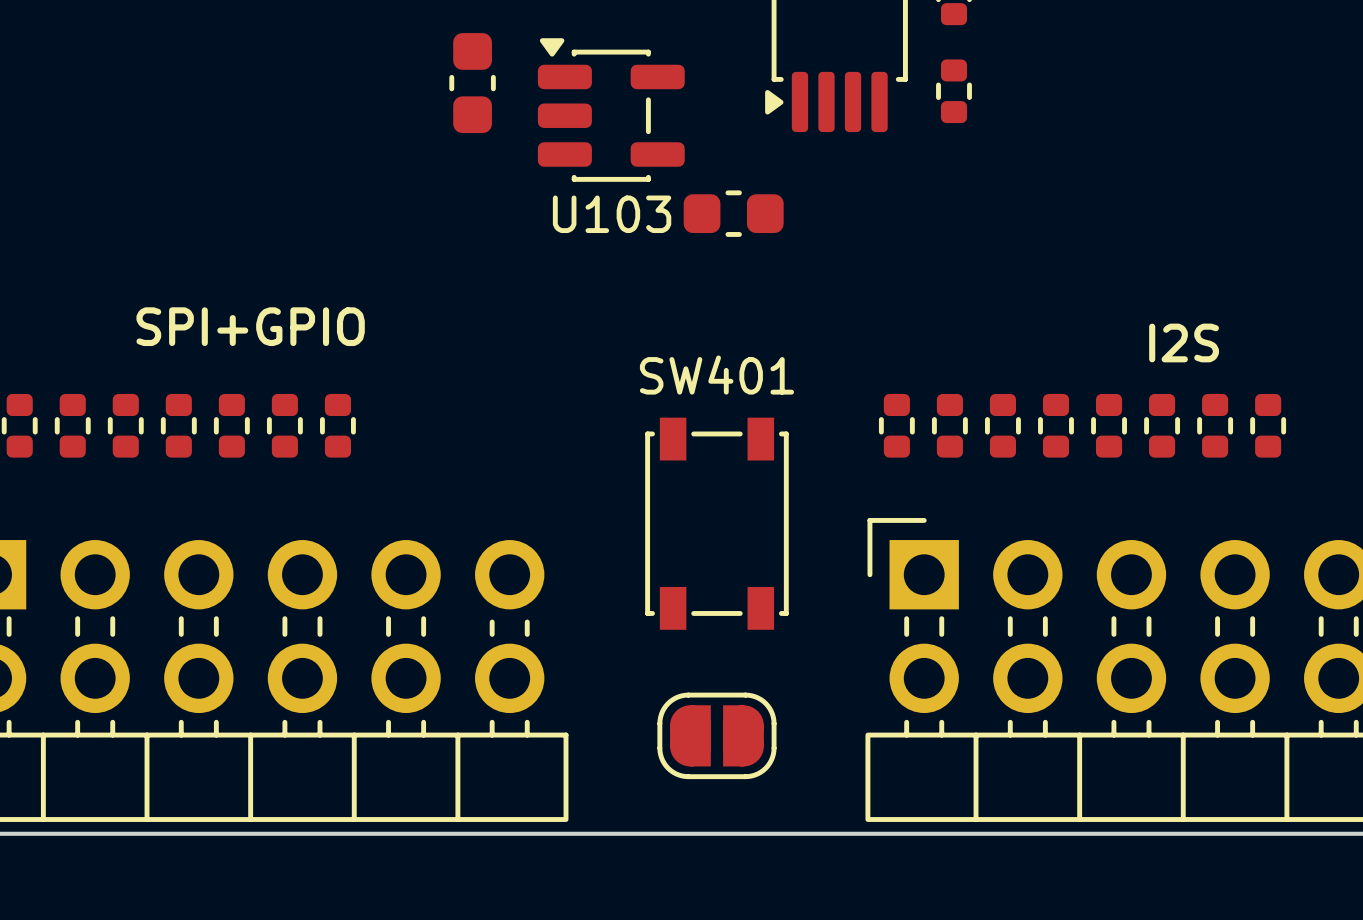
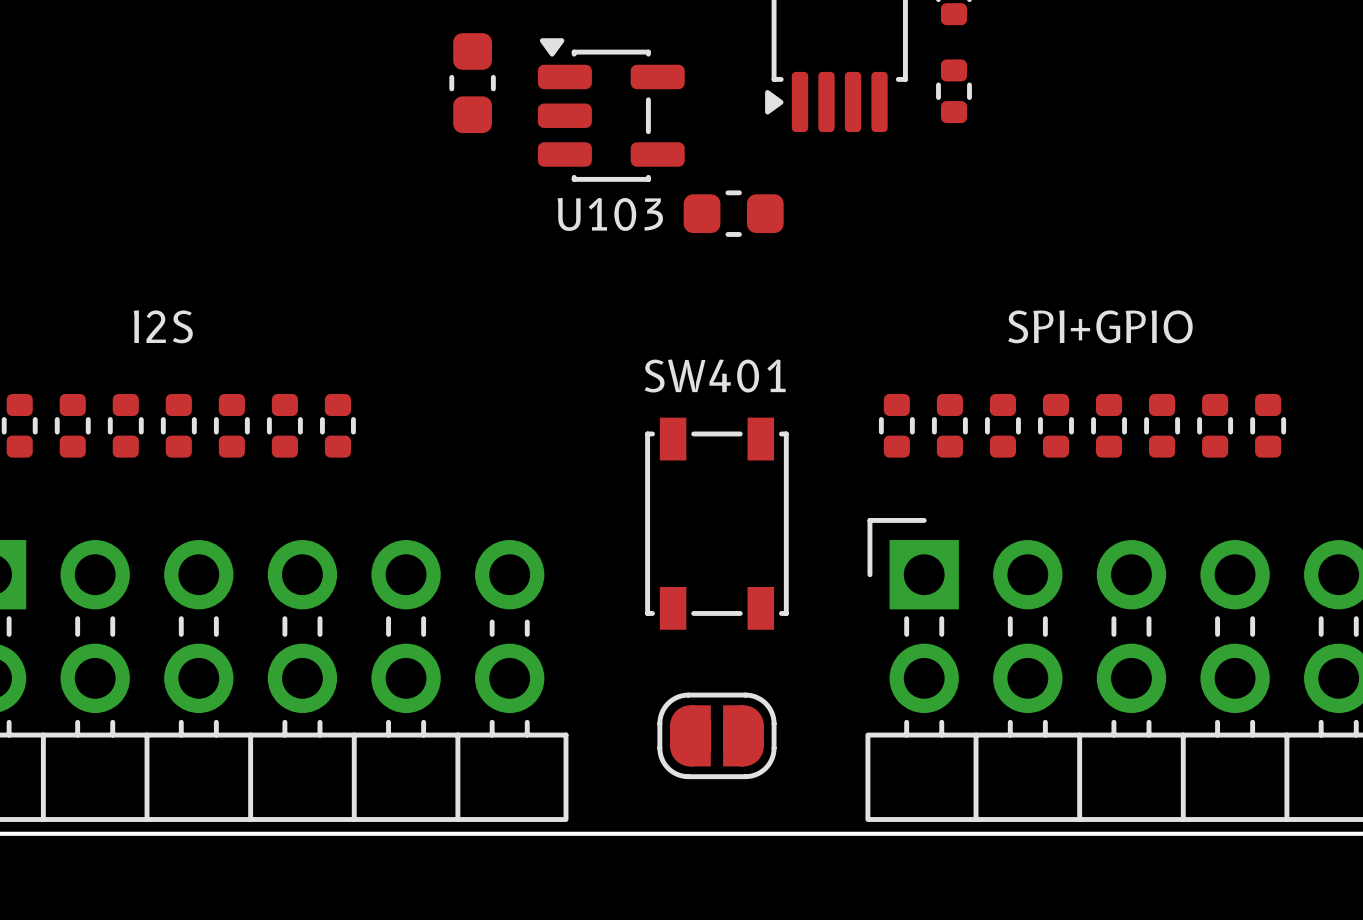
text: none -> I2S (163, 326)
text position: SPI+GPIO (250, 326) -> SPI+GPIO (1100, 326)
text: I2S (1184, 342) -> none

